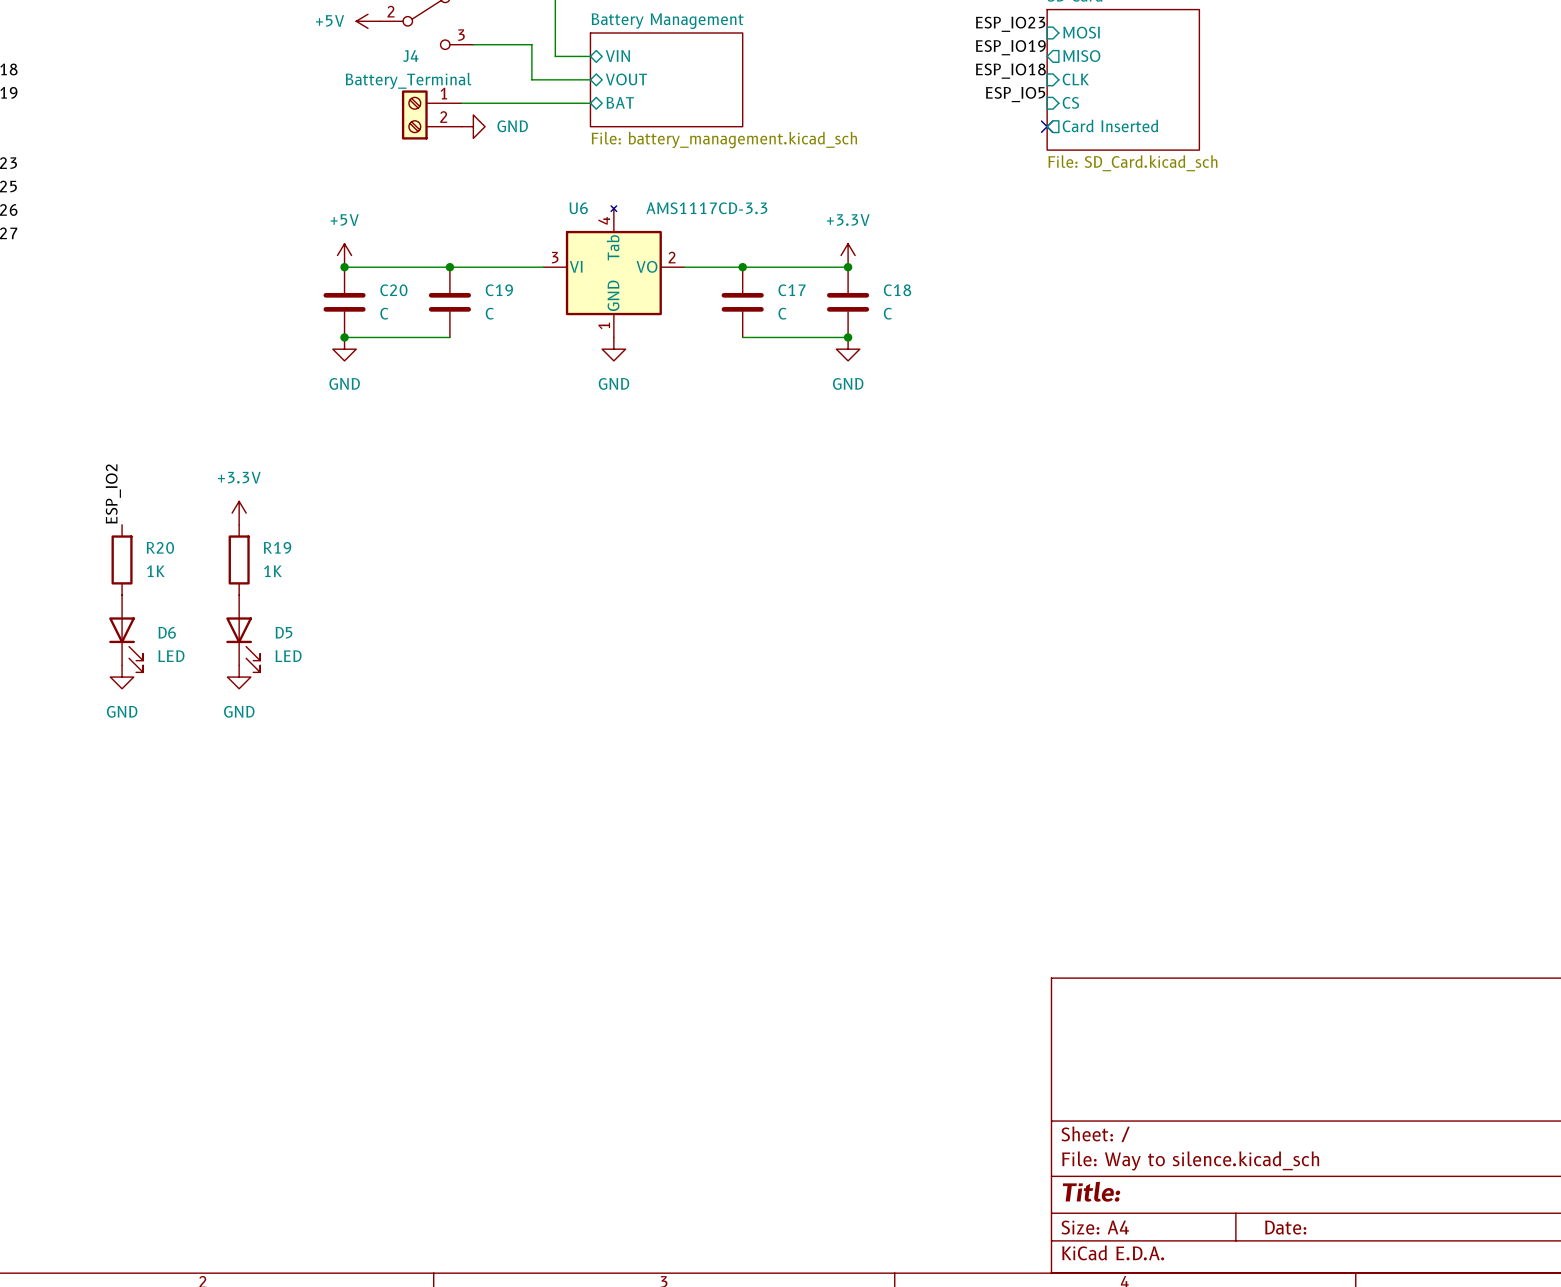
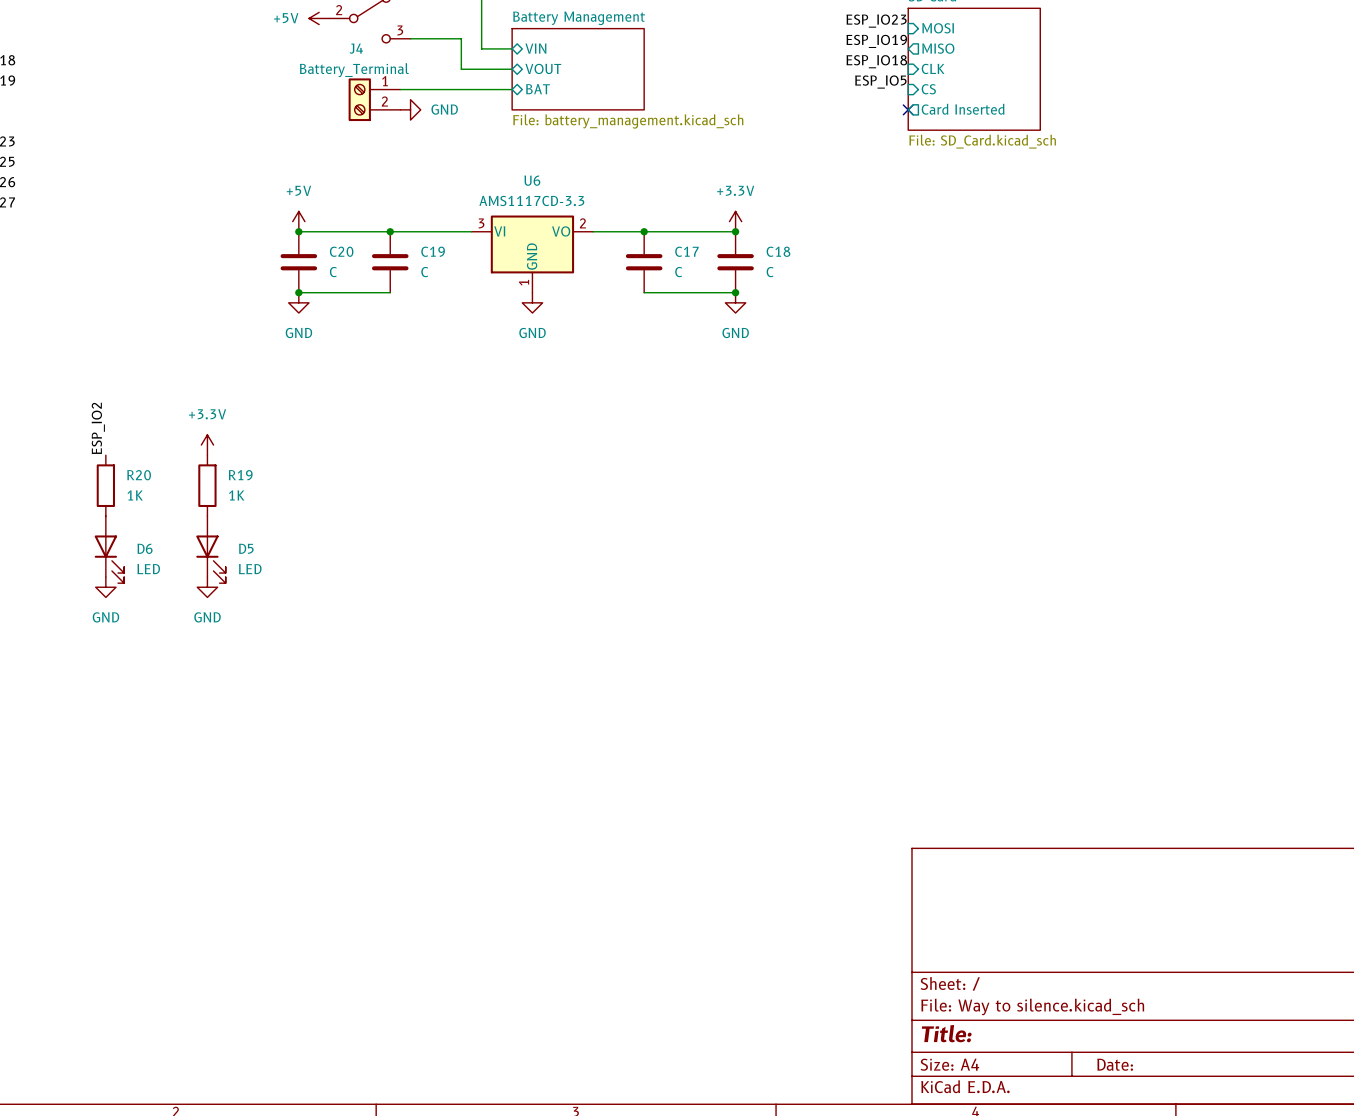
U6 symbol: [543, 205, 685, 338] -> [471, 215, 594, 293]
U6 name position: U6 (578, 208) -> U6 (532, 180)
U6 value position: AMS1117CD-3.3 (706, 208) -> AMS1117CD-3.3 (531, 200)

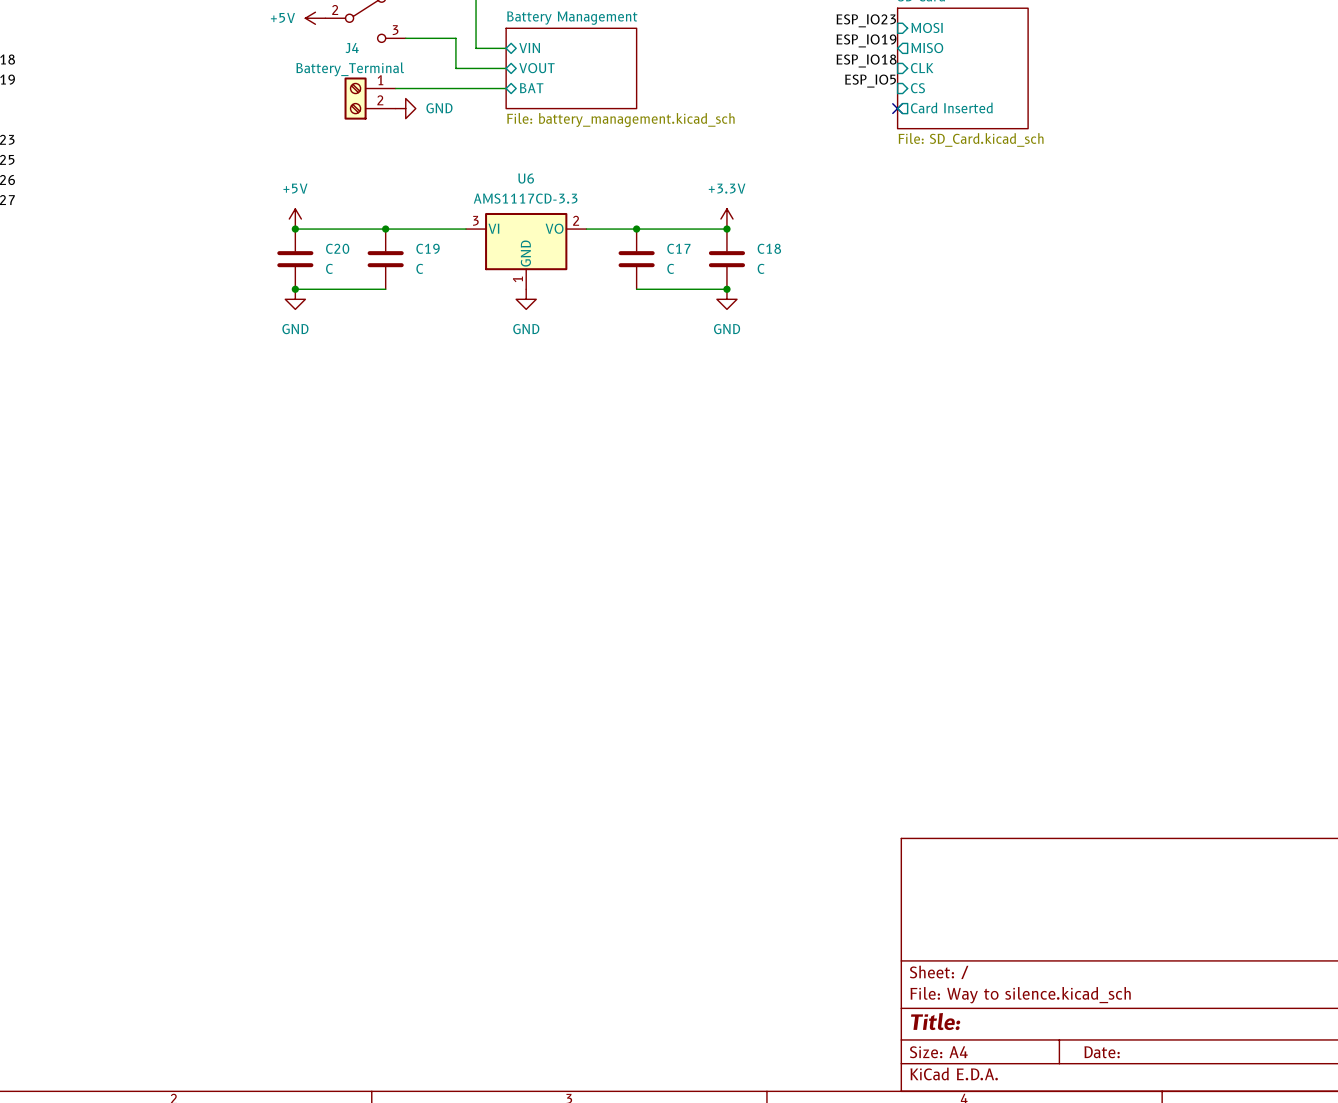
label: ESP_IO2 (98, 428) -> none
power symbol: +3.3V (207, 445) -> none
R20: 1K (105, 485) -> none
R19: 1K (207, 485) -> none
D6: LED (109, 549) -> none
D5: LED (210, 549) -> none
power symbol: GND (105, 587) -> none
power symbol: GND (207, 587) -> none

